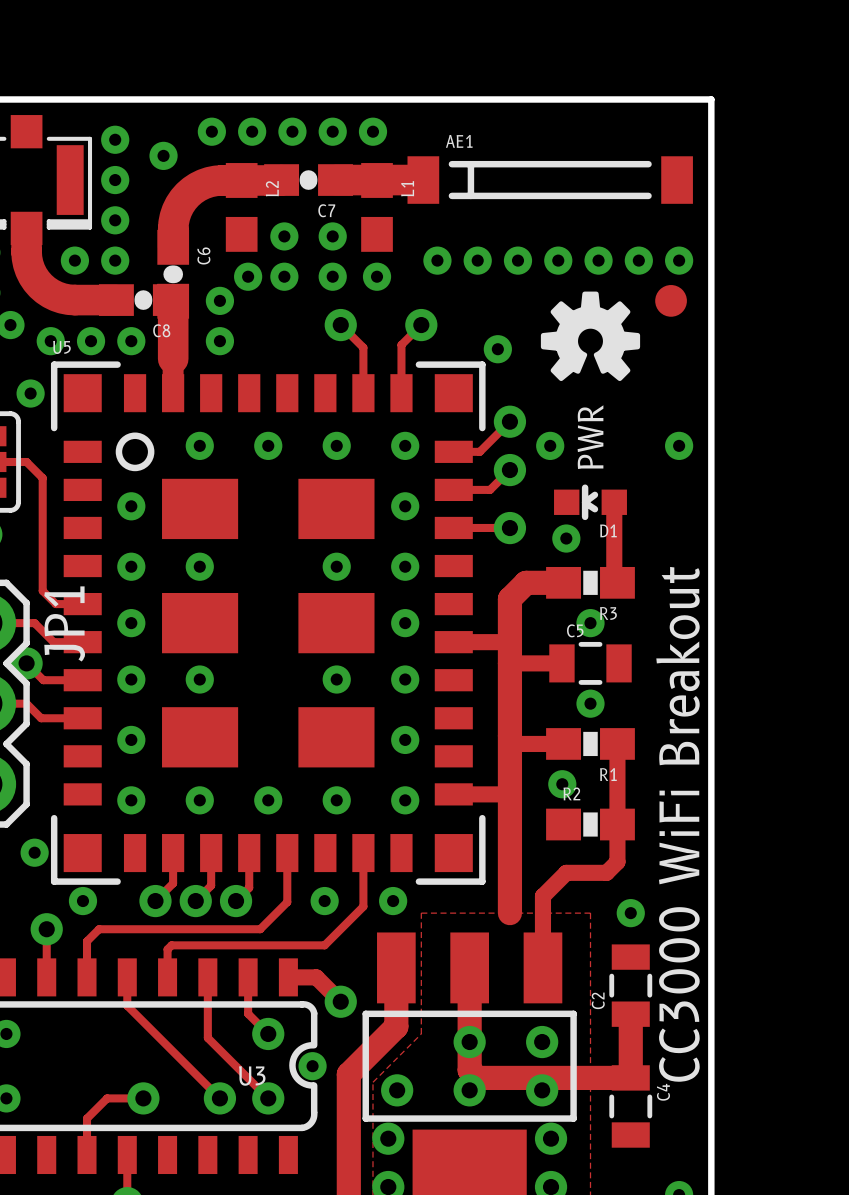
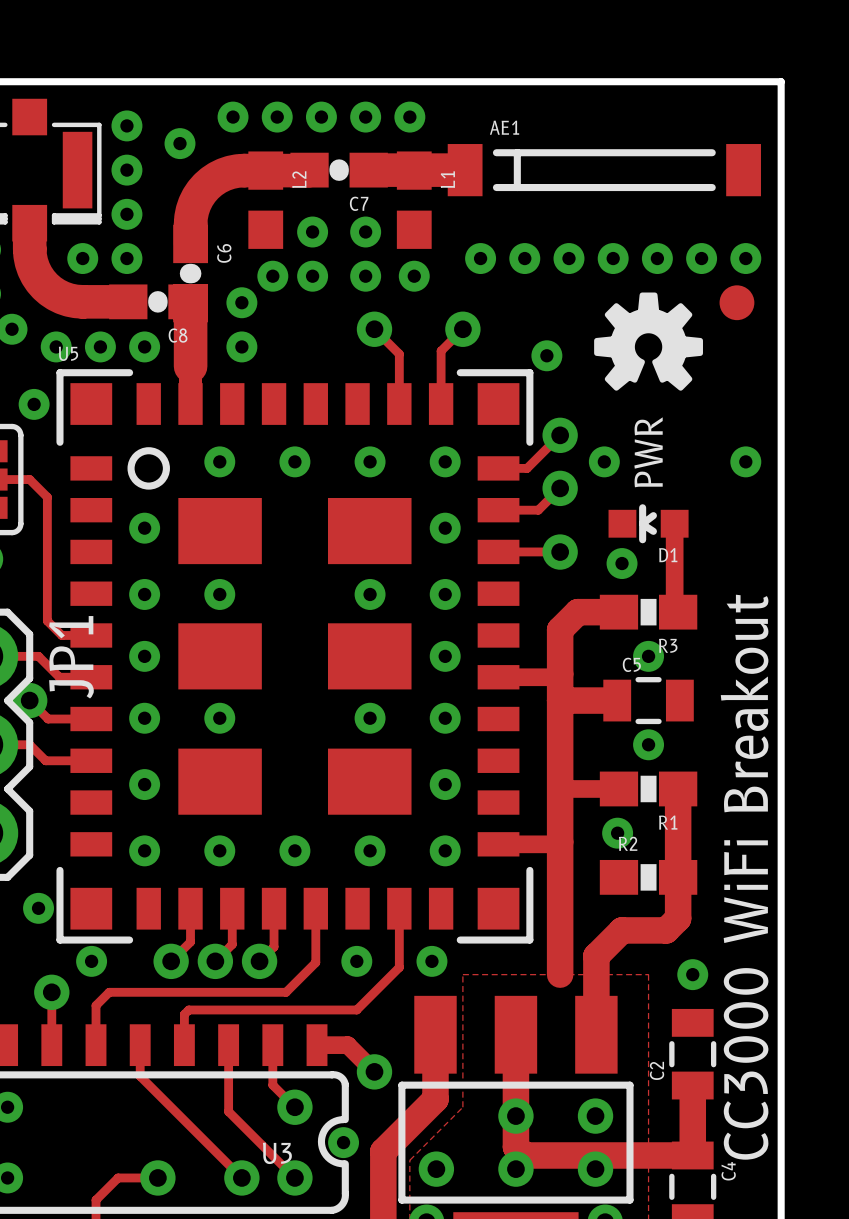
track width: thin (509, 663) (561, 663) -> thick (560, 700) (617, 700)
track width: thin (617, 743) (617, 862) (606, 872) (566, 872) (542, 896) (542, 967) -> thick (678, 788) (678, 918) (666, 930) (622, 930) (596, 956) (596, 1034)

